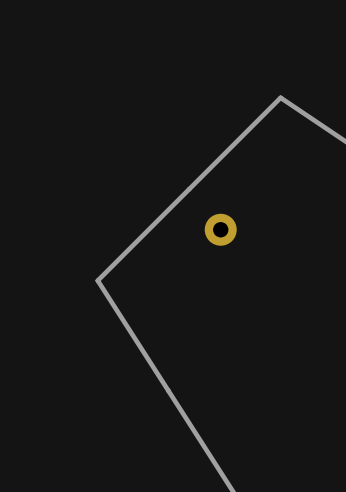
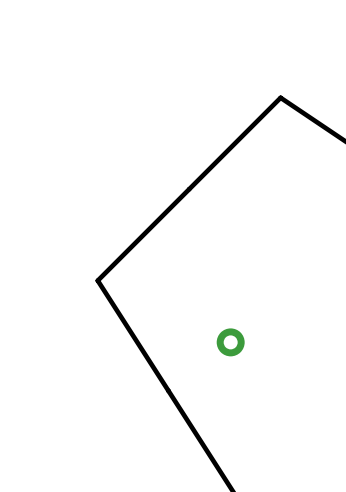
via: (220, 229) -> none
via: none -> (230, 342)

